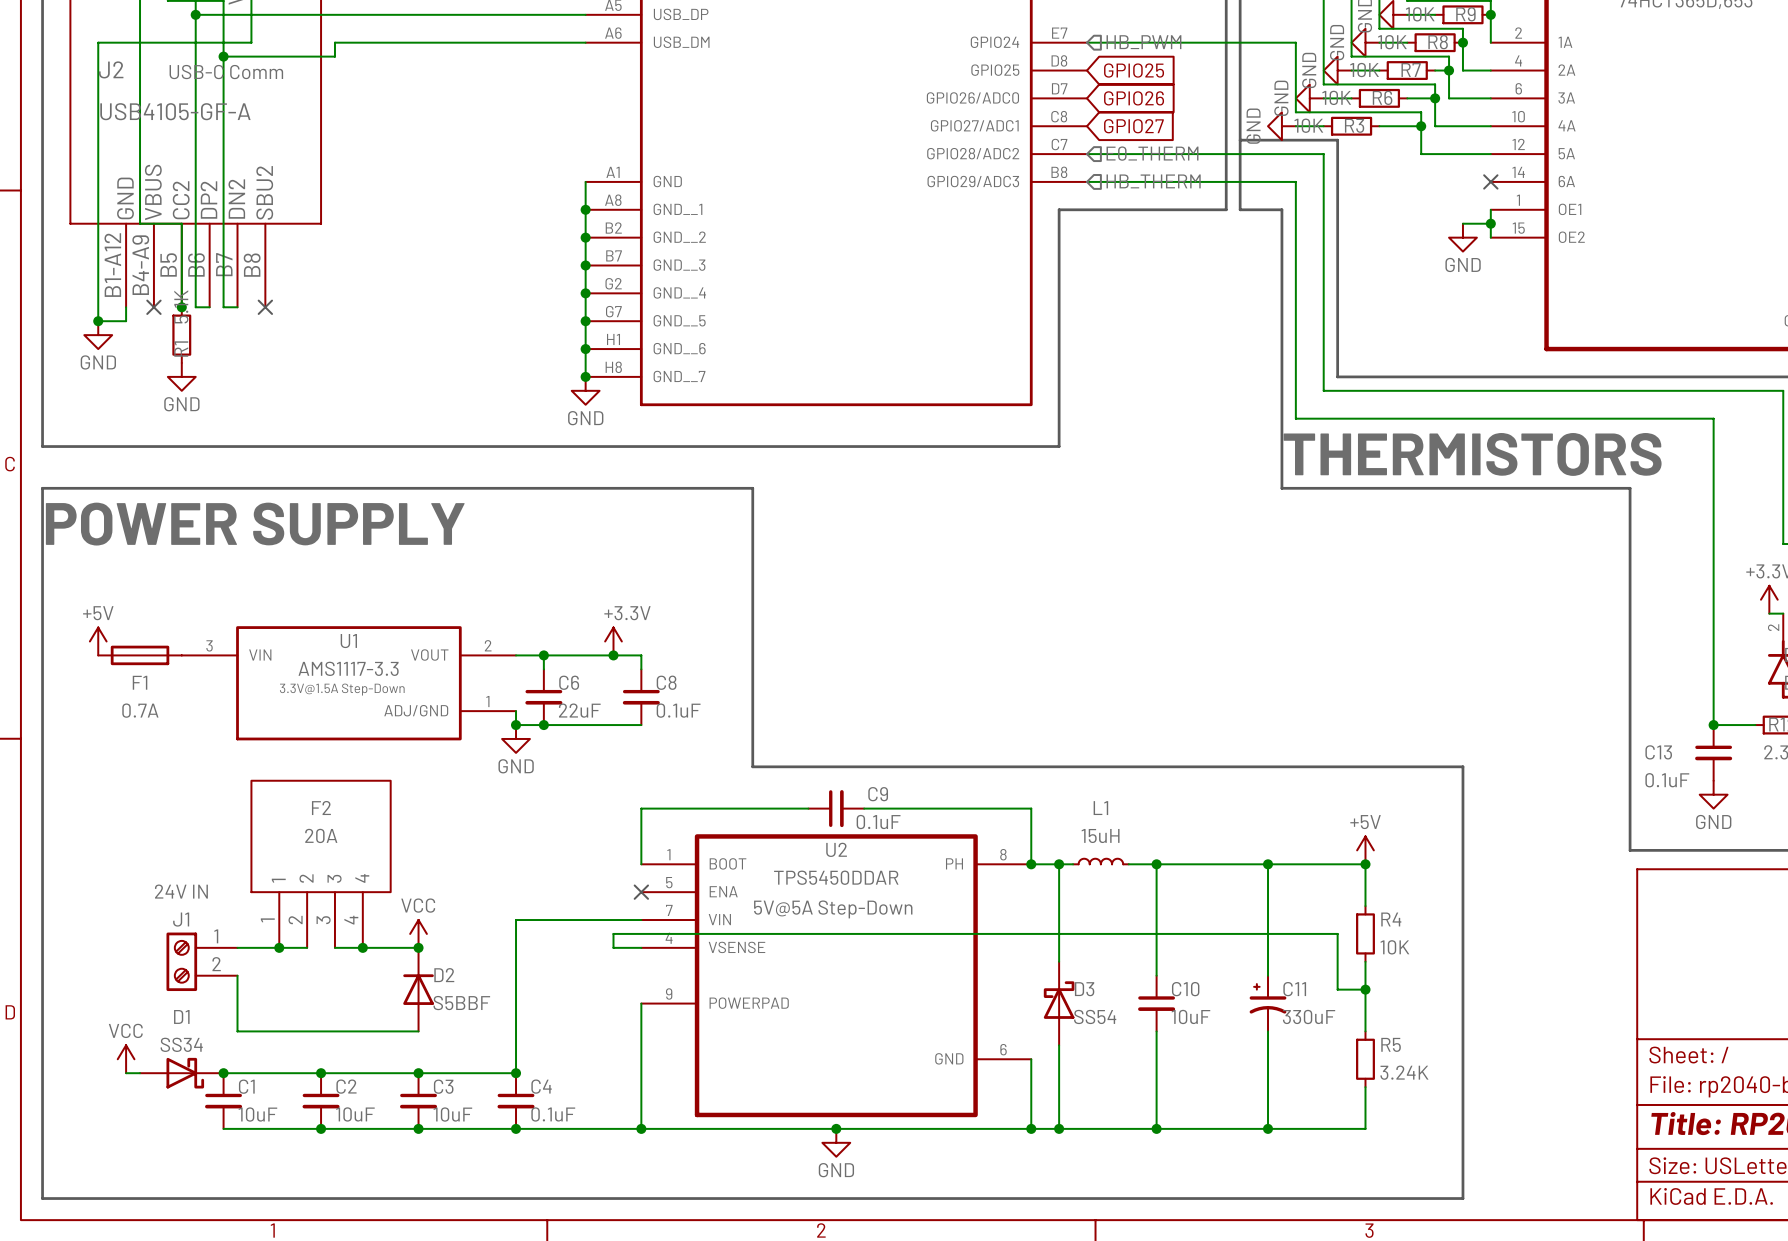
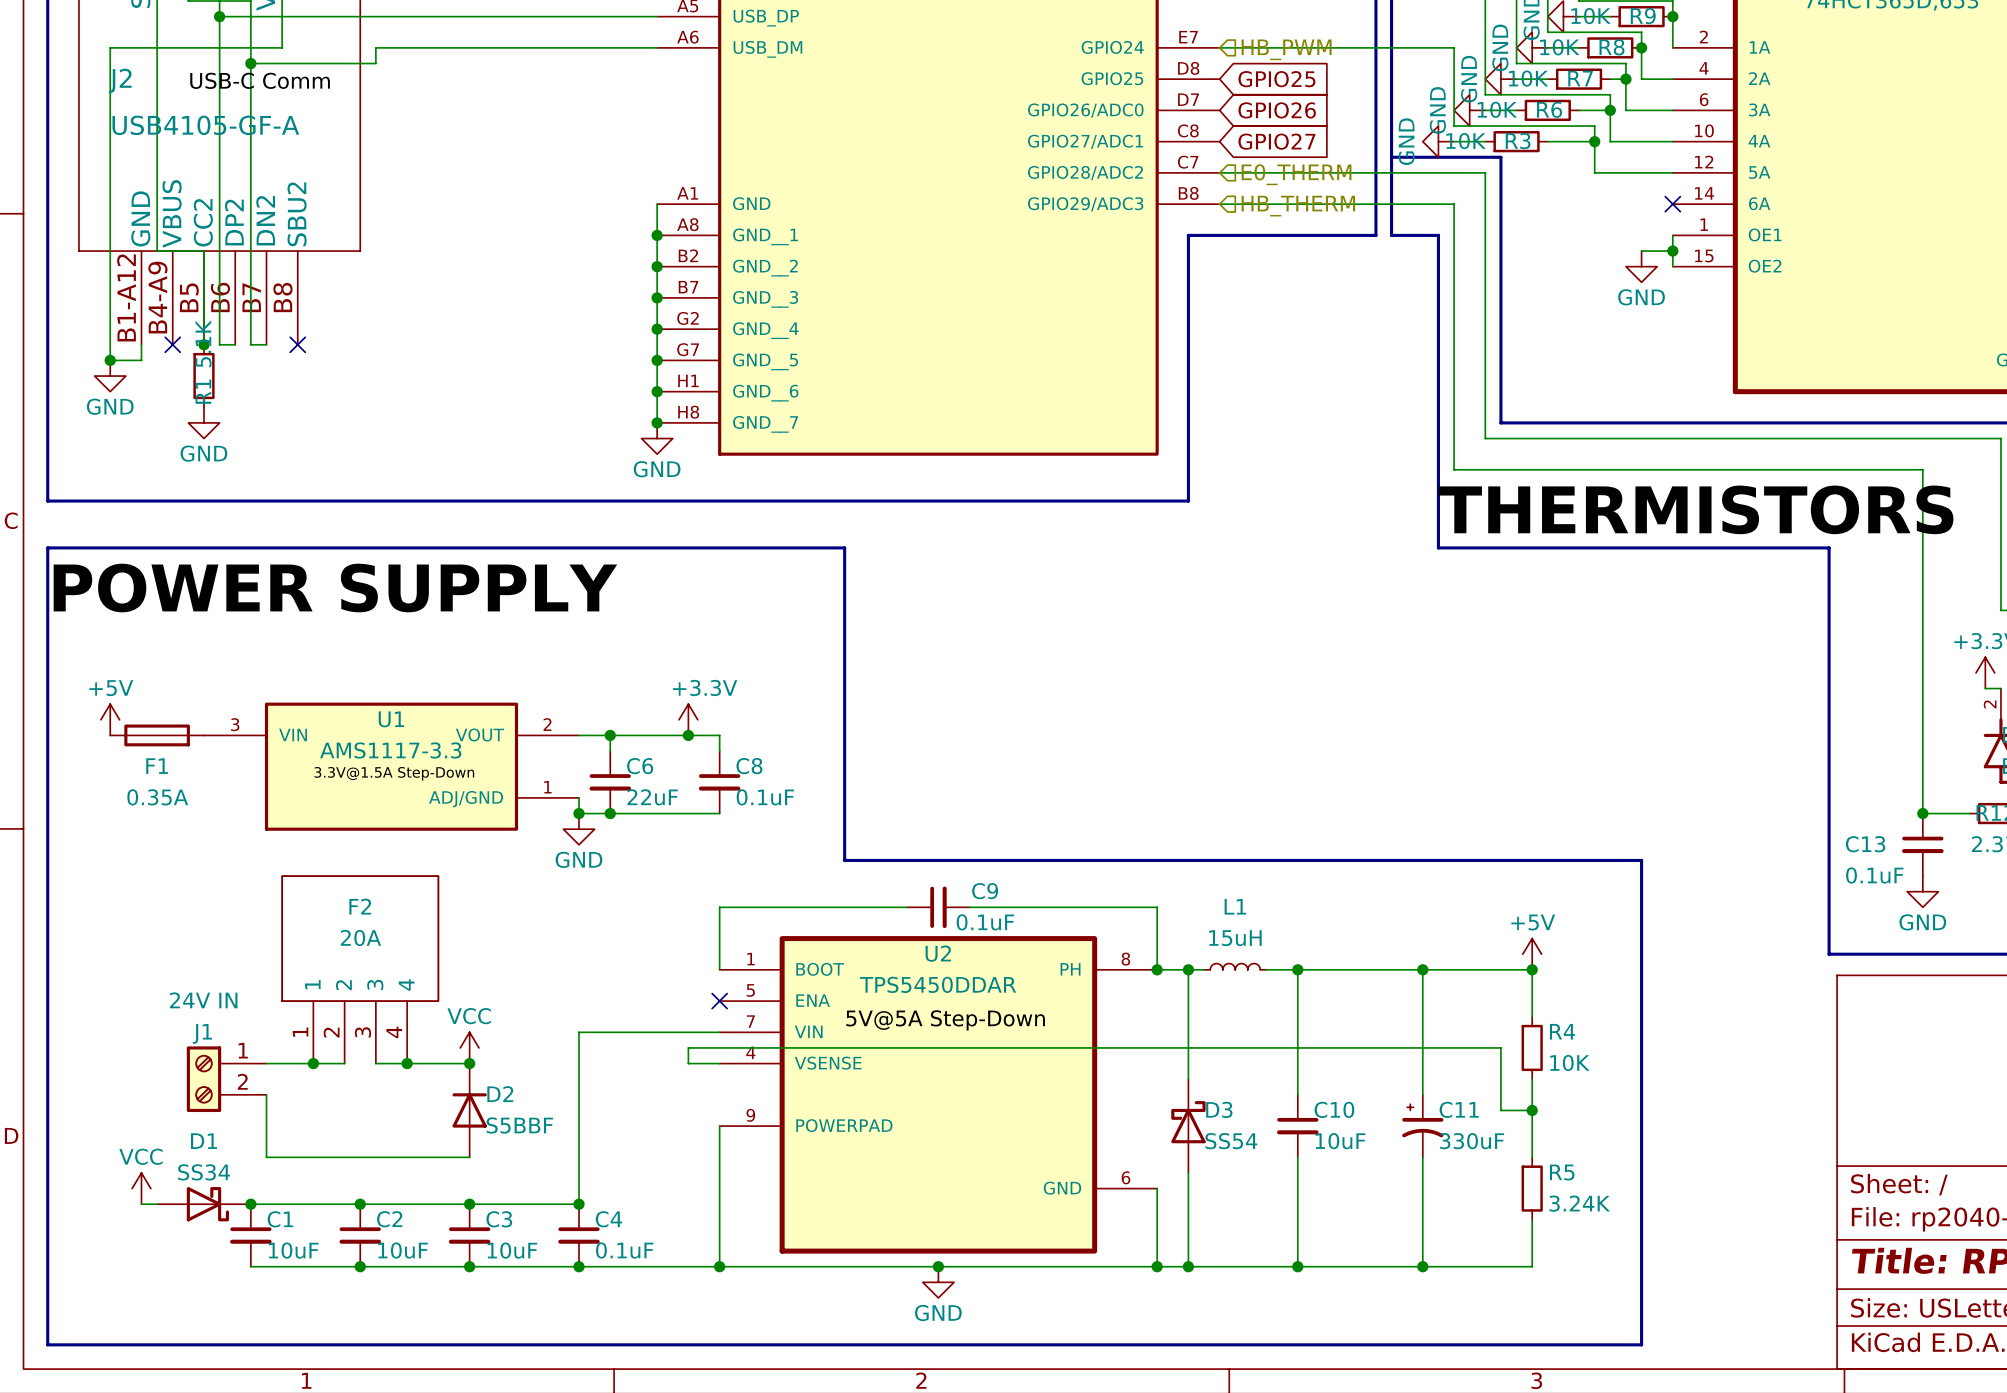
F1 value: 0.7A (140, 710) -> 0.35A (157, 797)

